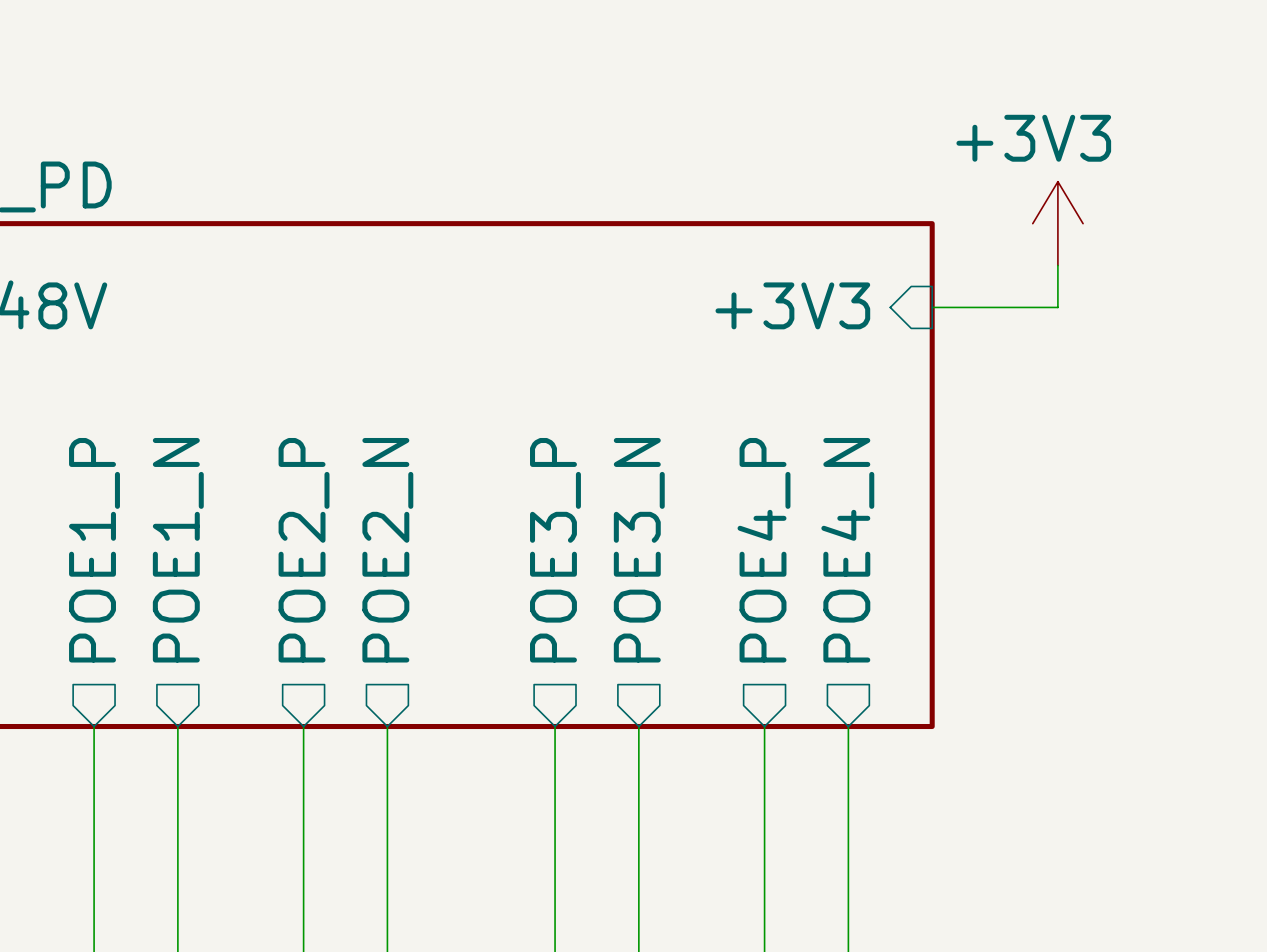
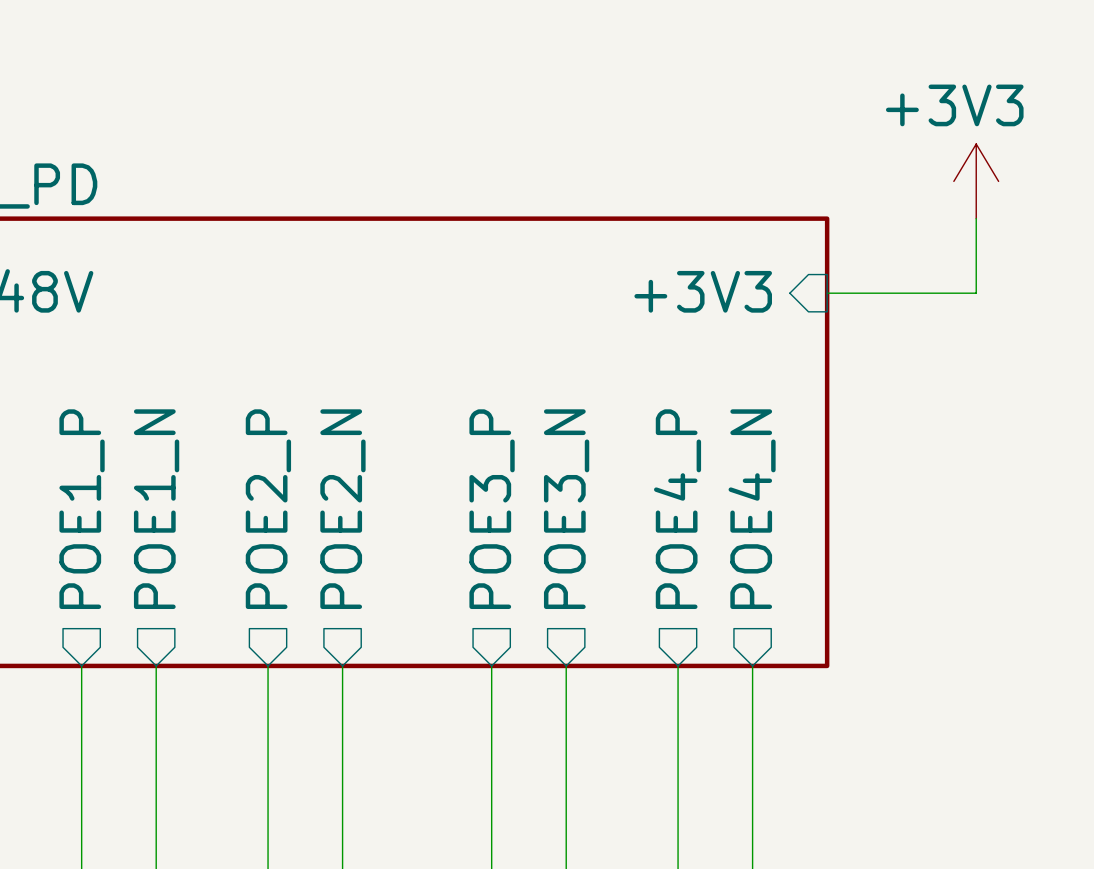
power symbol position: +3V3 (1057, 223) -> +3V3 (976, 181)
wire: (1057, 265) (1057, 307) -> (976, 218) (976, 293) (938, 293)

